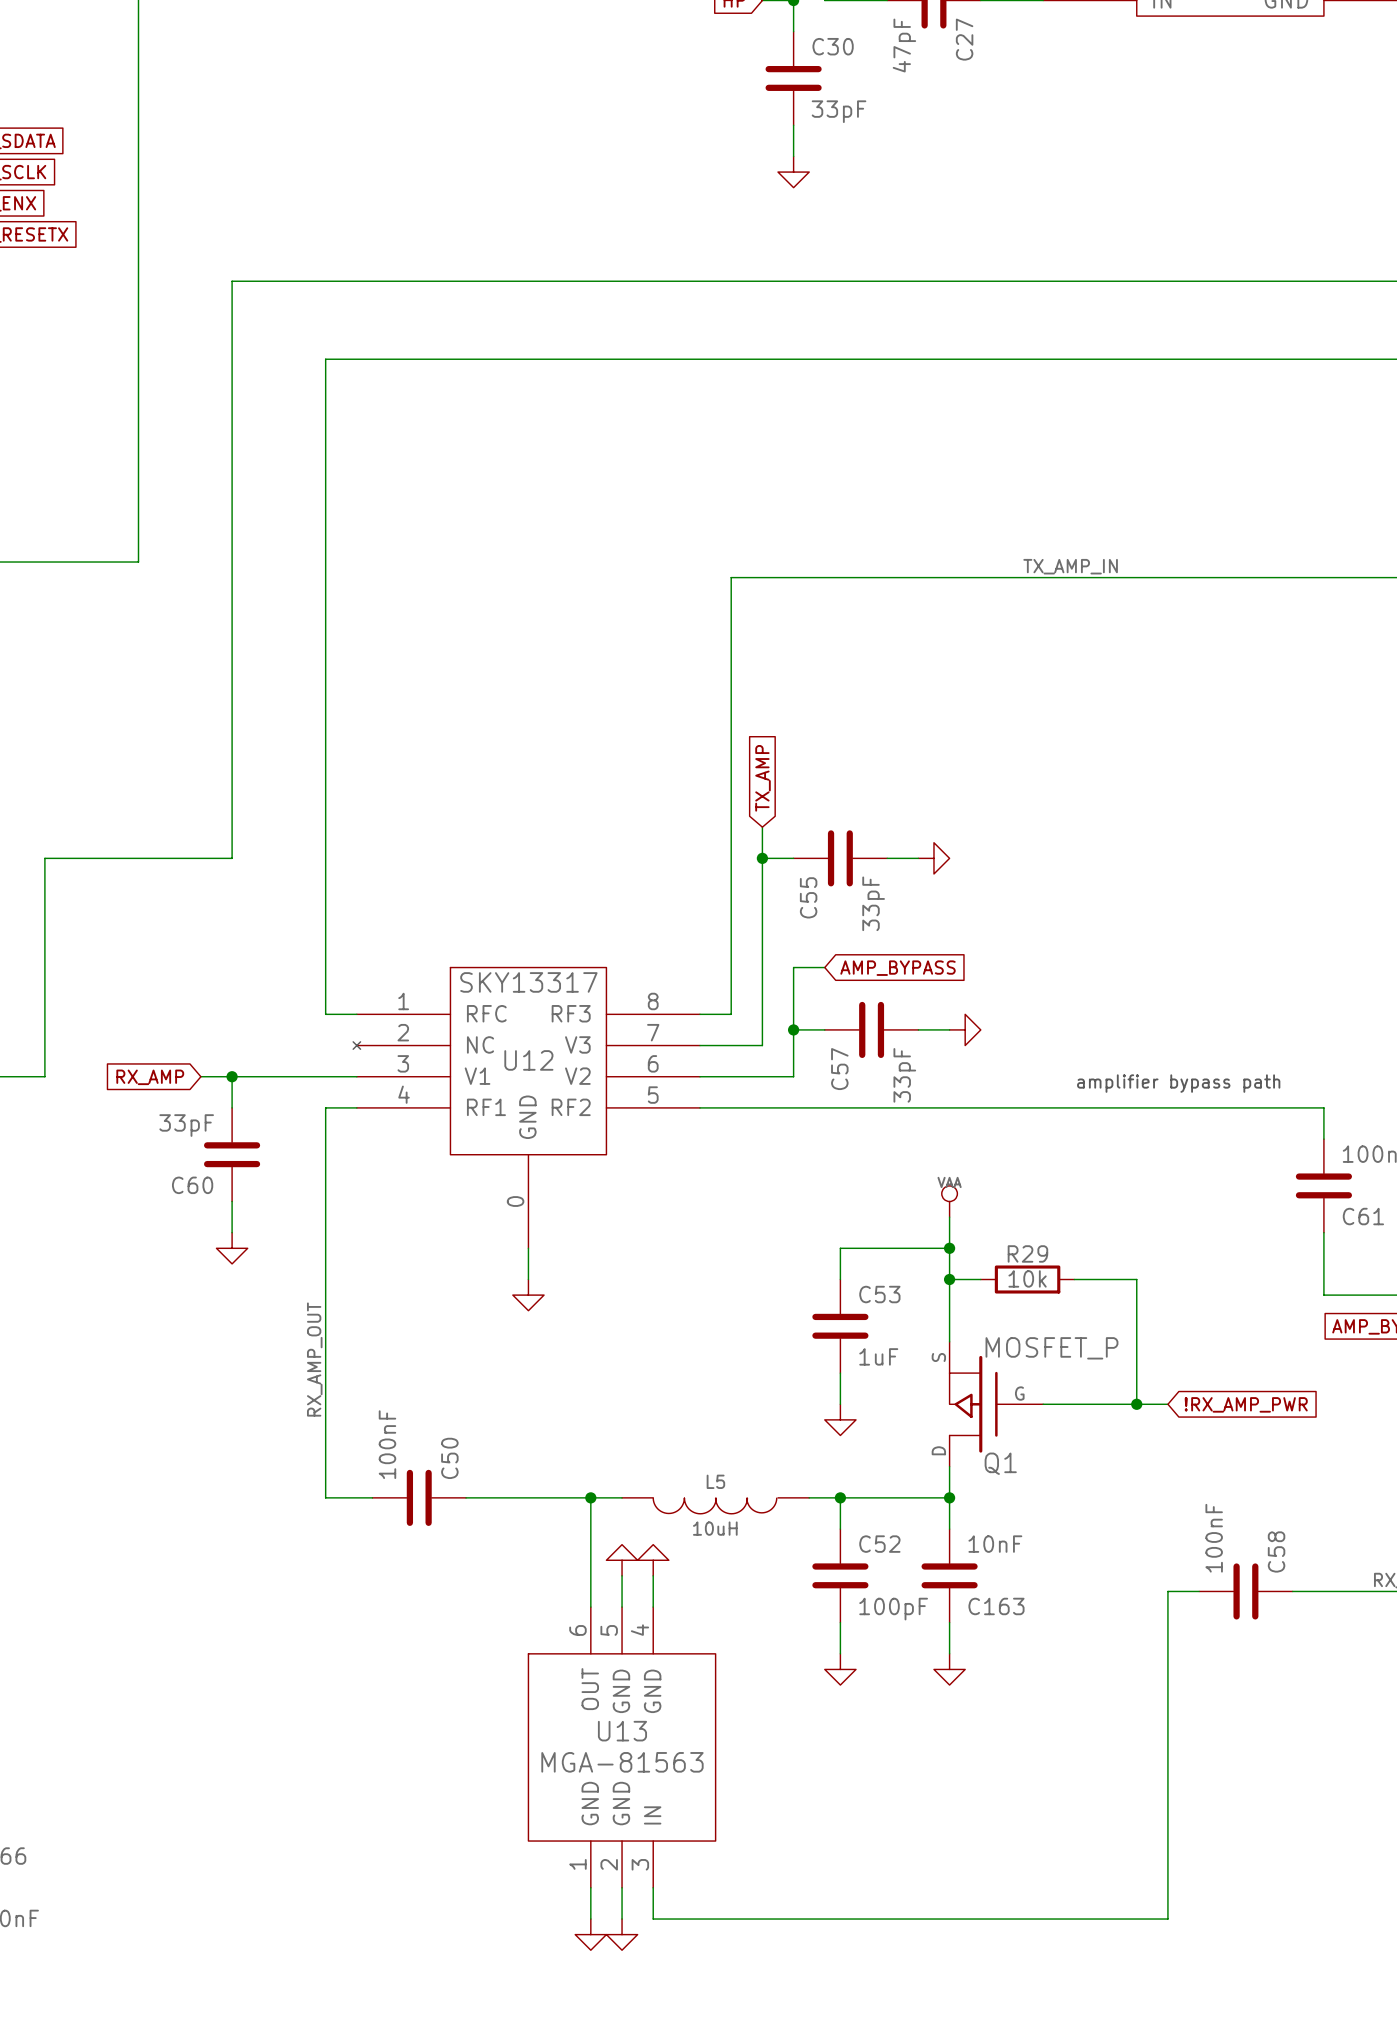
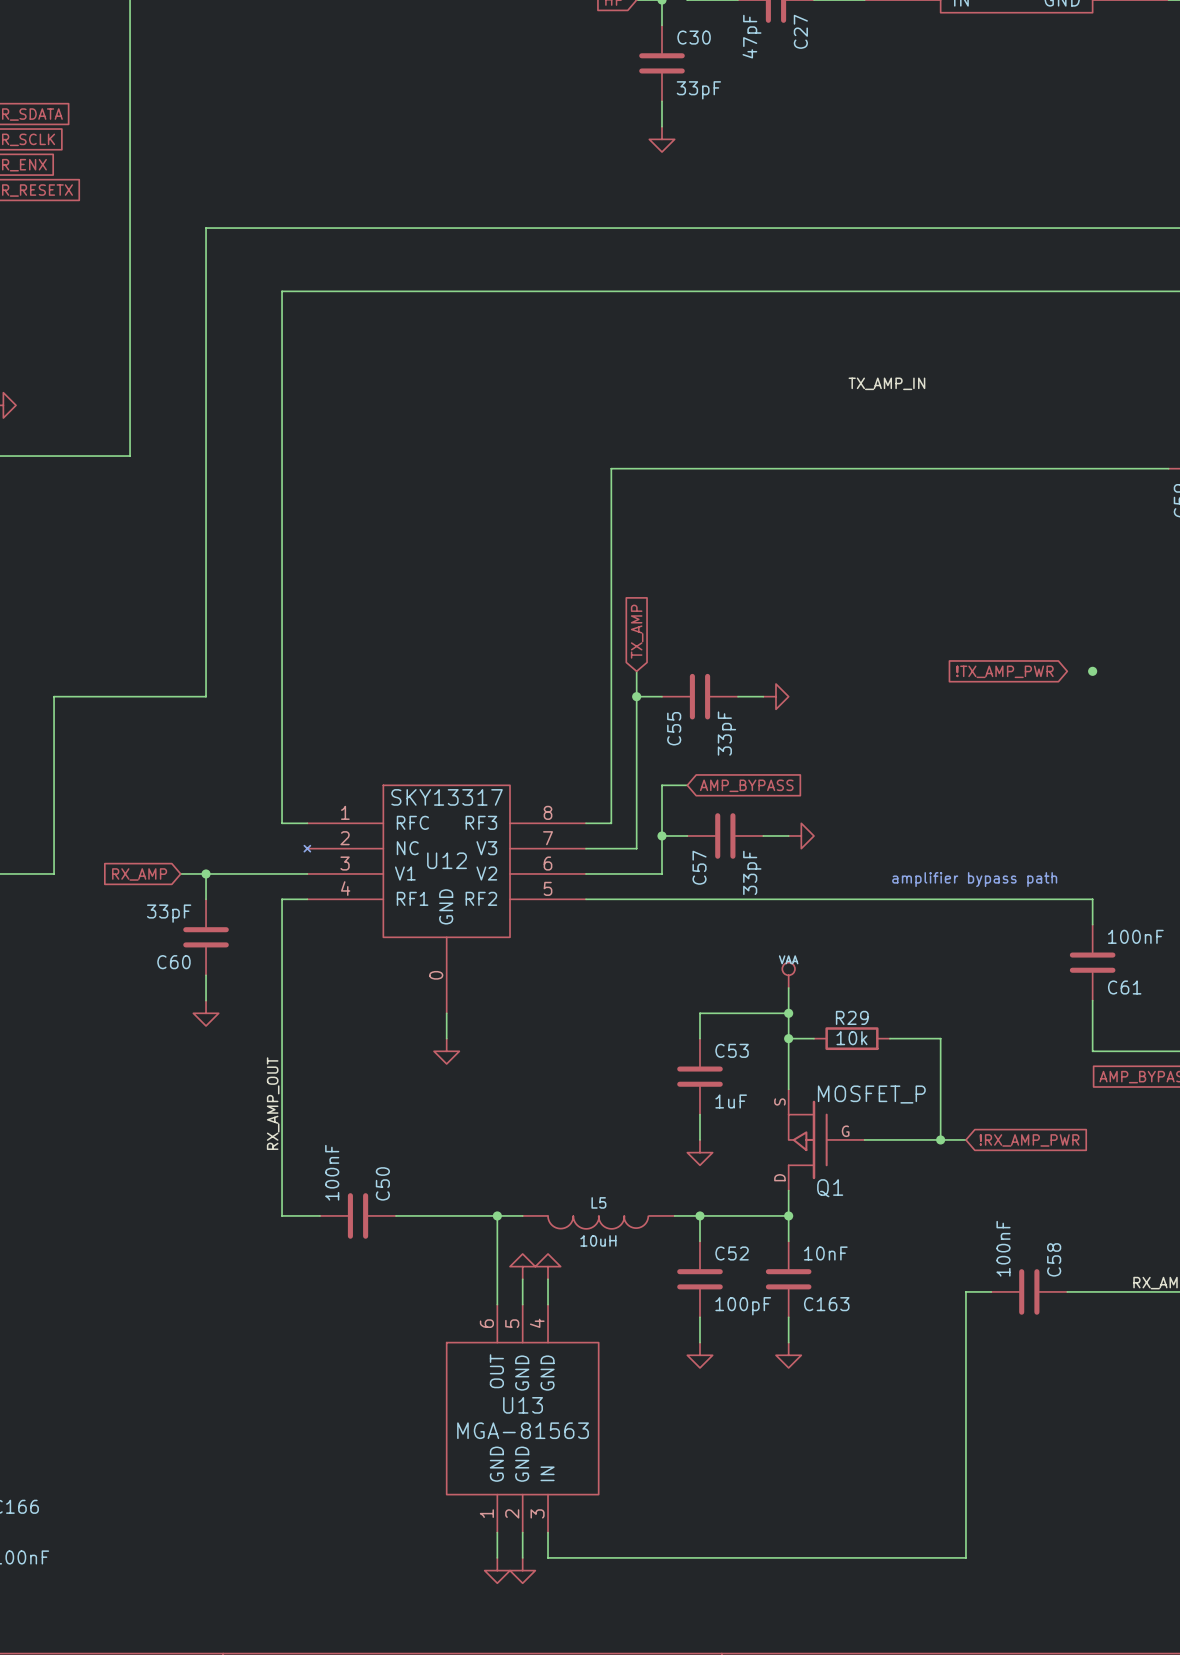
label position: TX_AMP_IN (1070, 566) -> TX_AMP_IN (886, 383)
global label: none -> !TX_AMP_PWR (1004, 671)
junction: none -> (1092, 671)

